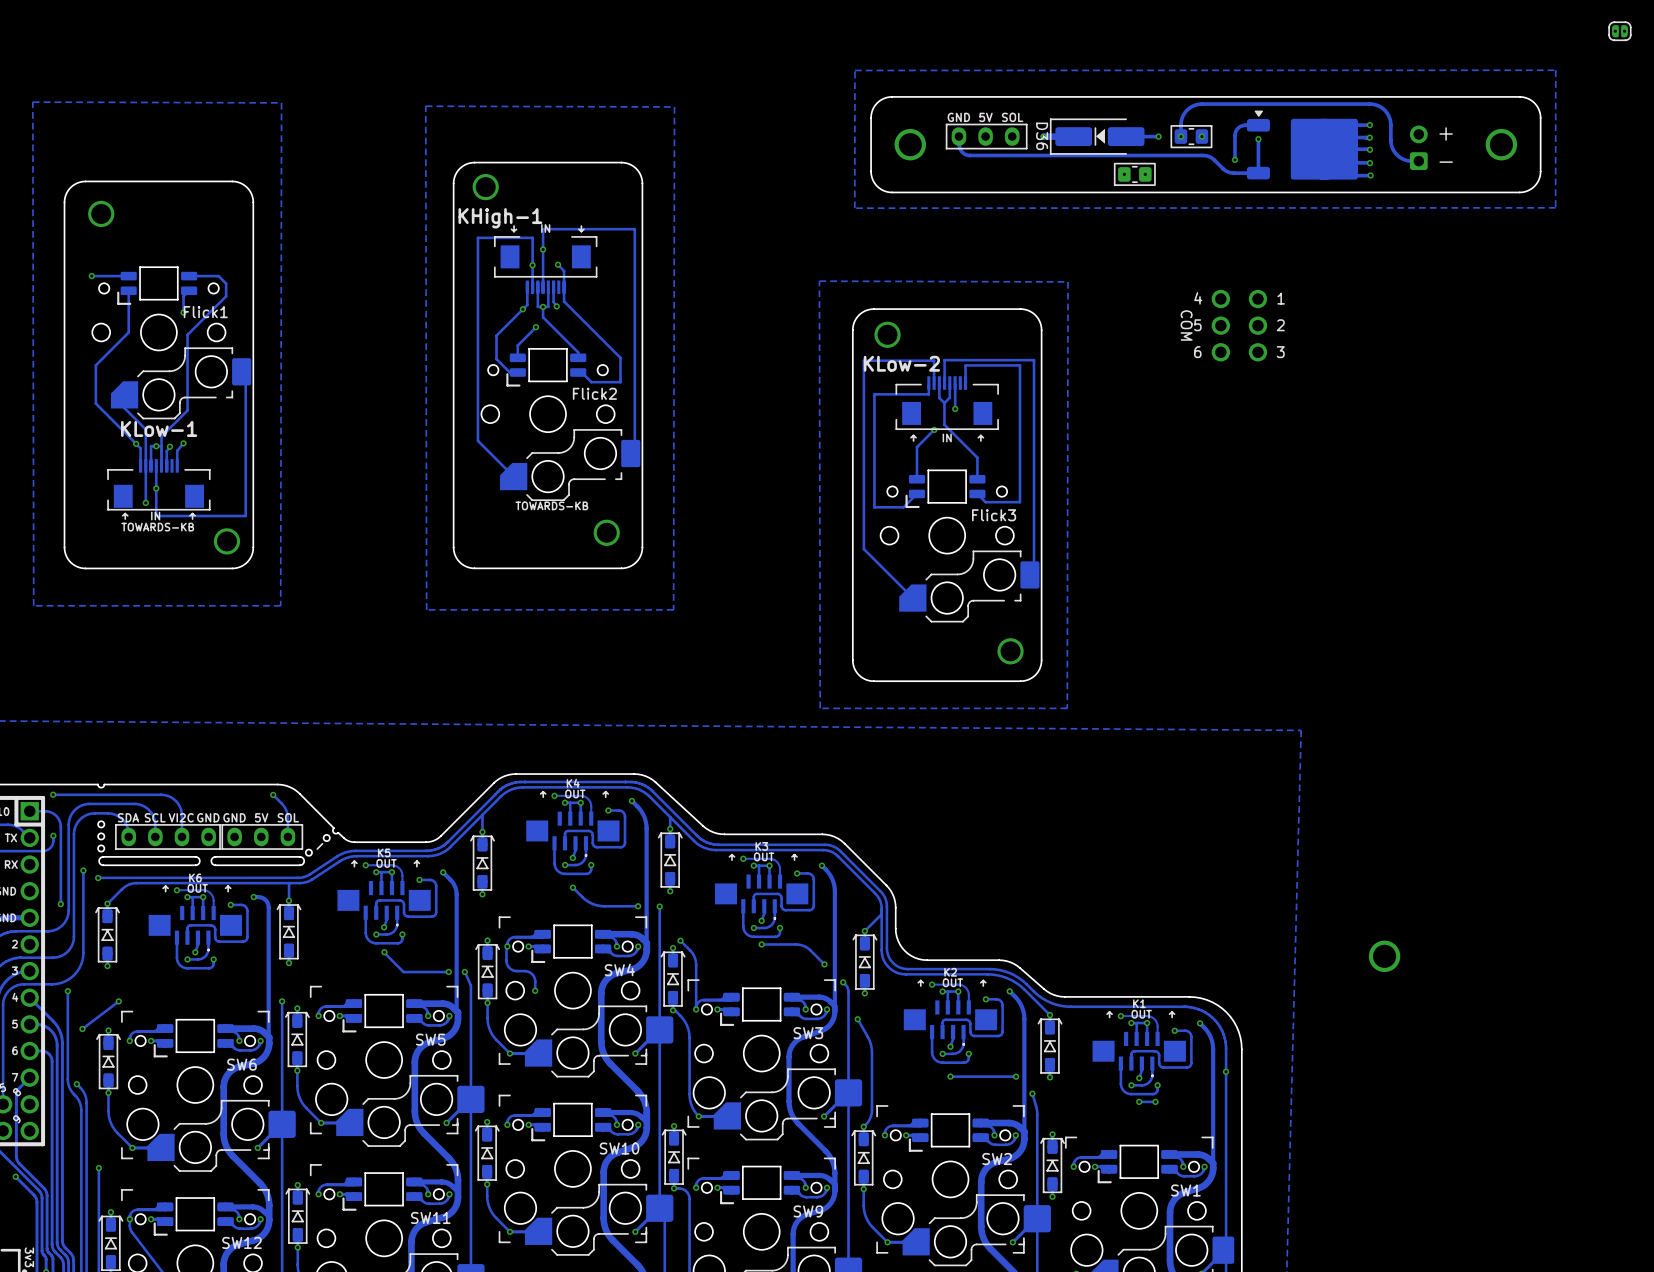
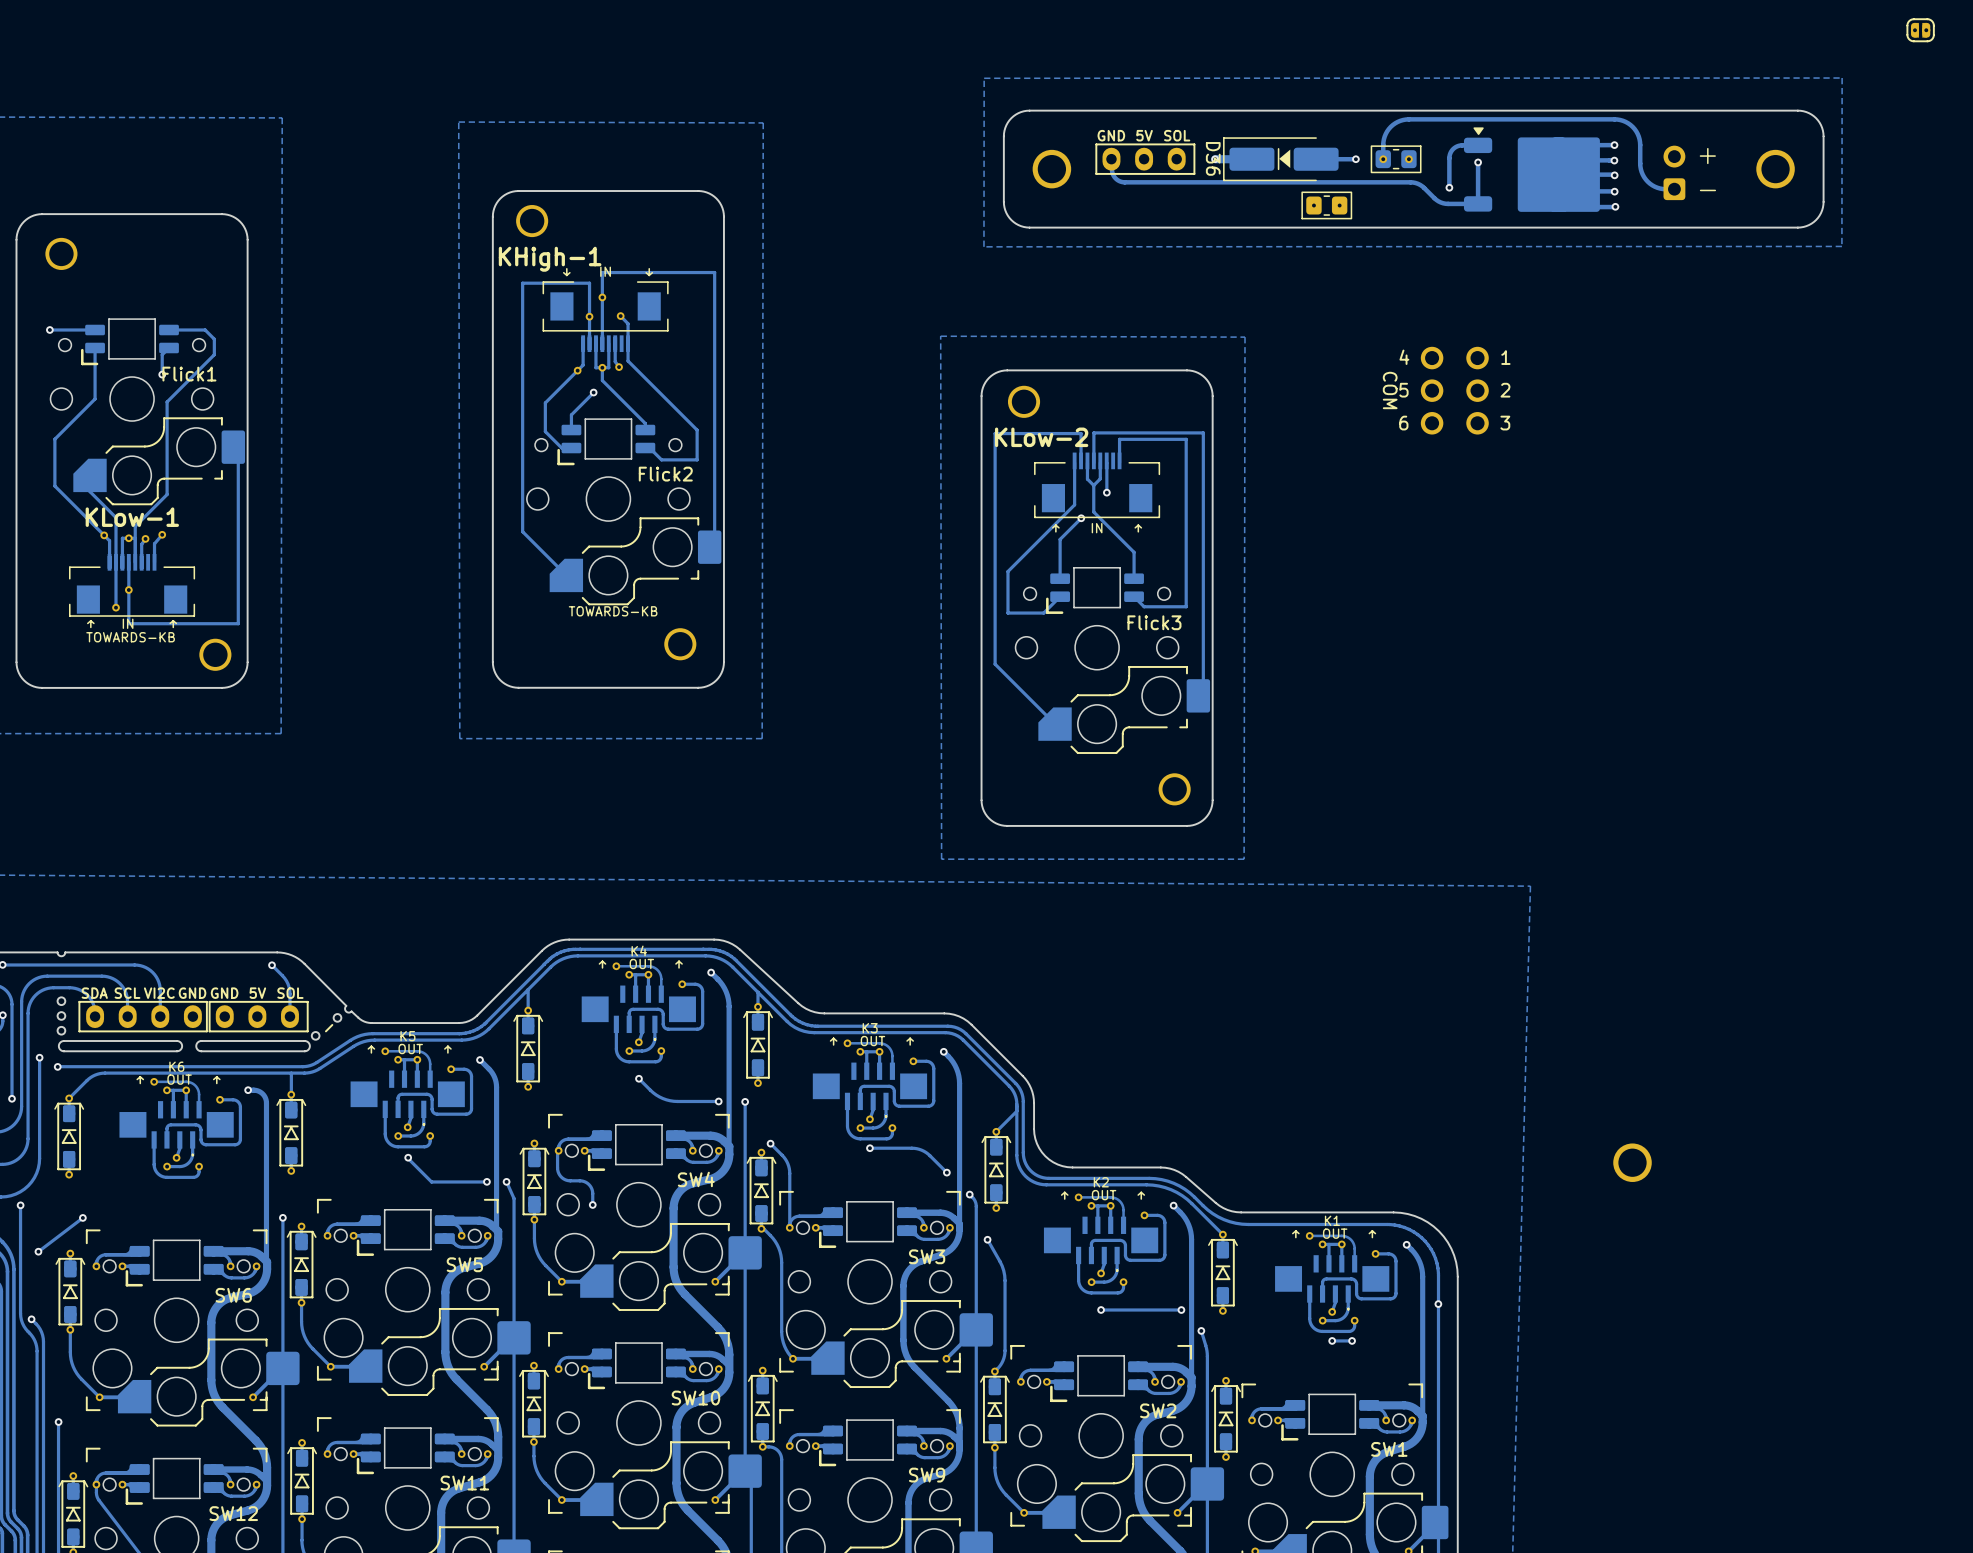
track: (928, 394) (874, 394) (874, 473) -> (1074, 474) (1074, 504) (1007, 571)

